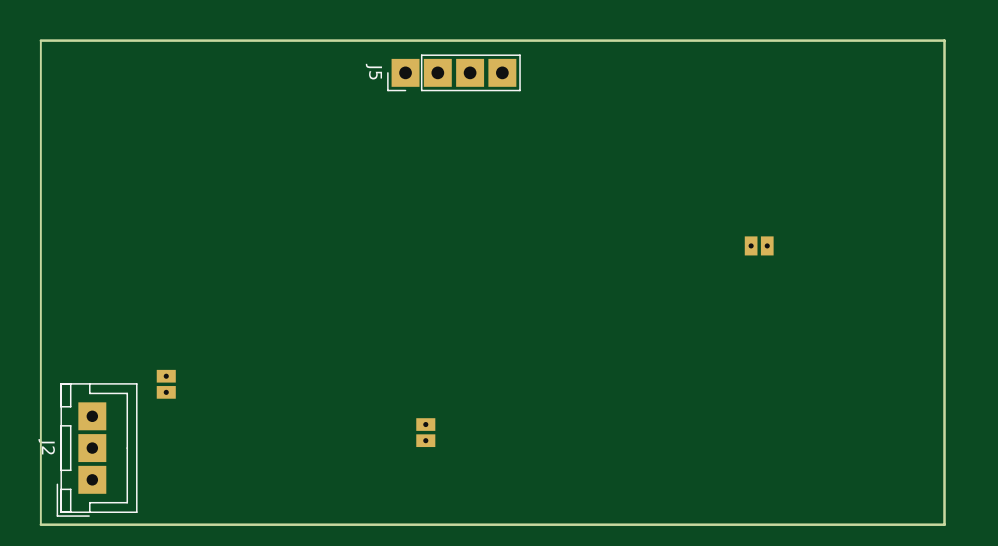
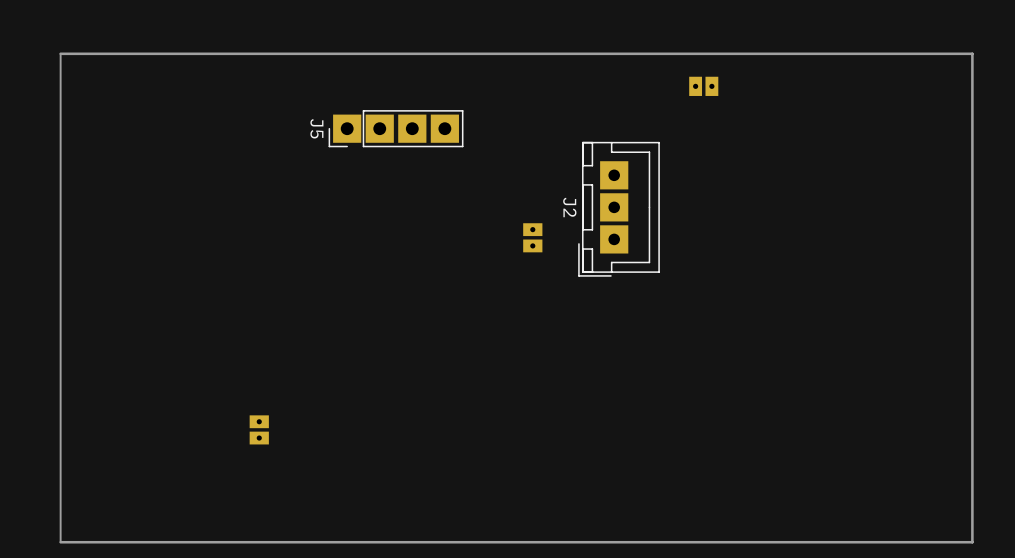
J5 position: (453, 72) -> (396, 128)
part: none -> (703, 86)
part: none -> (532, 237)
part: (759, 245) -> none
part position: (166, 384) -> (259, 429)
part: (425, 432) -> none
J2 position: (97, 449) -> (619, 209)

